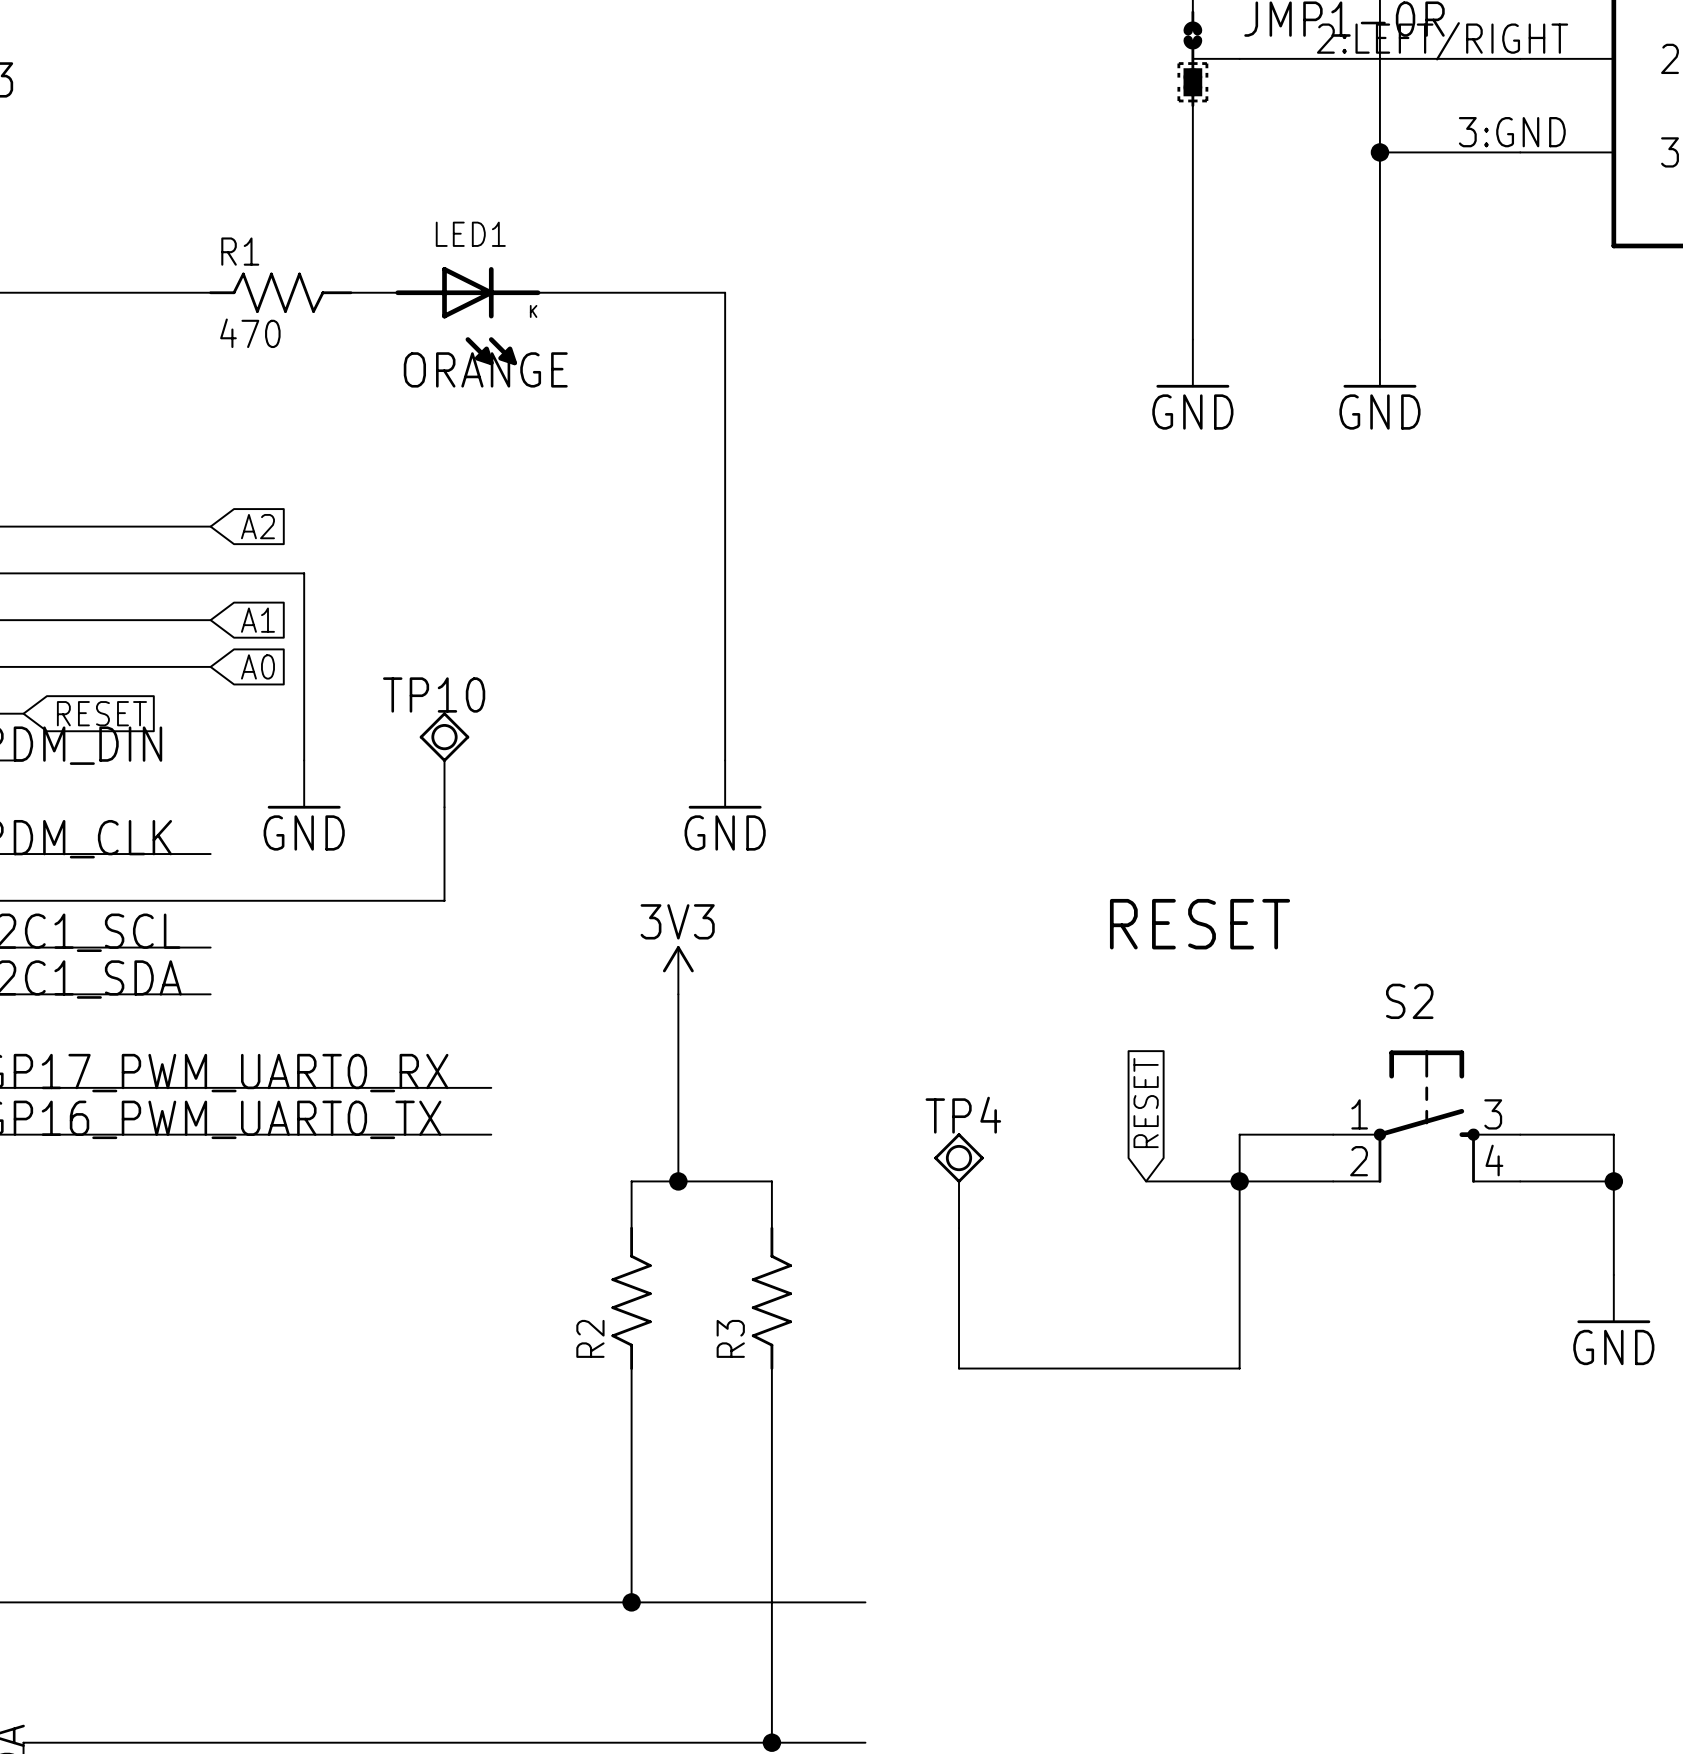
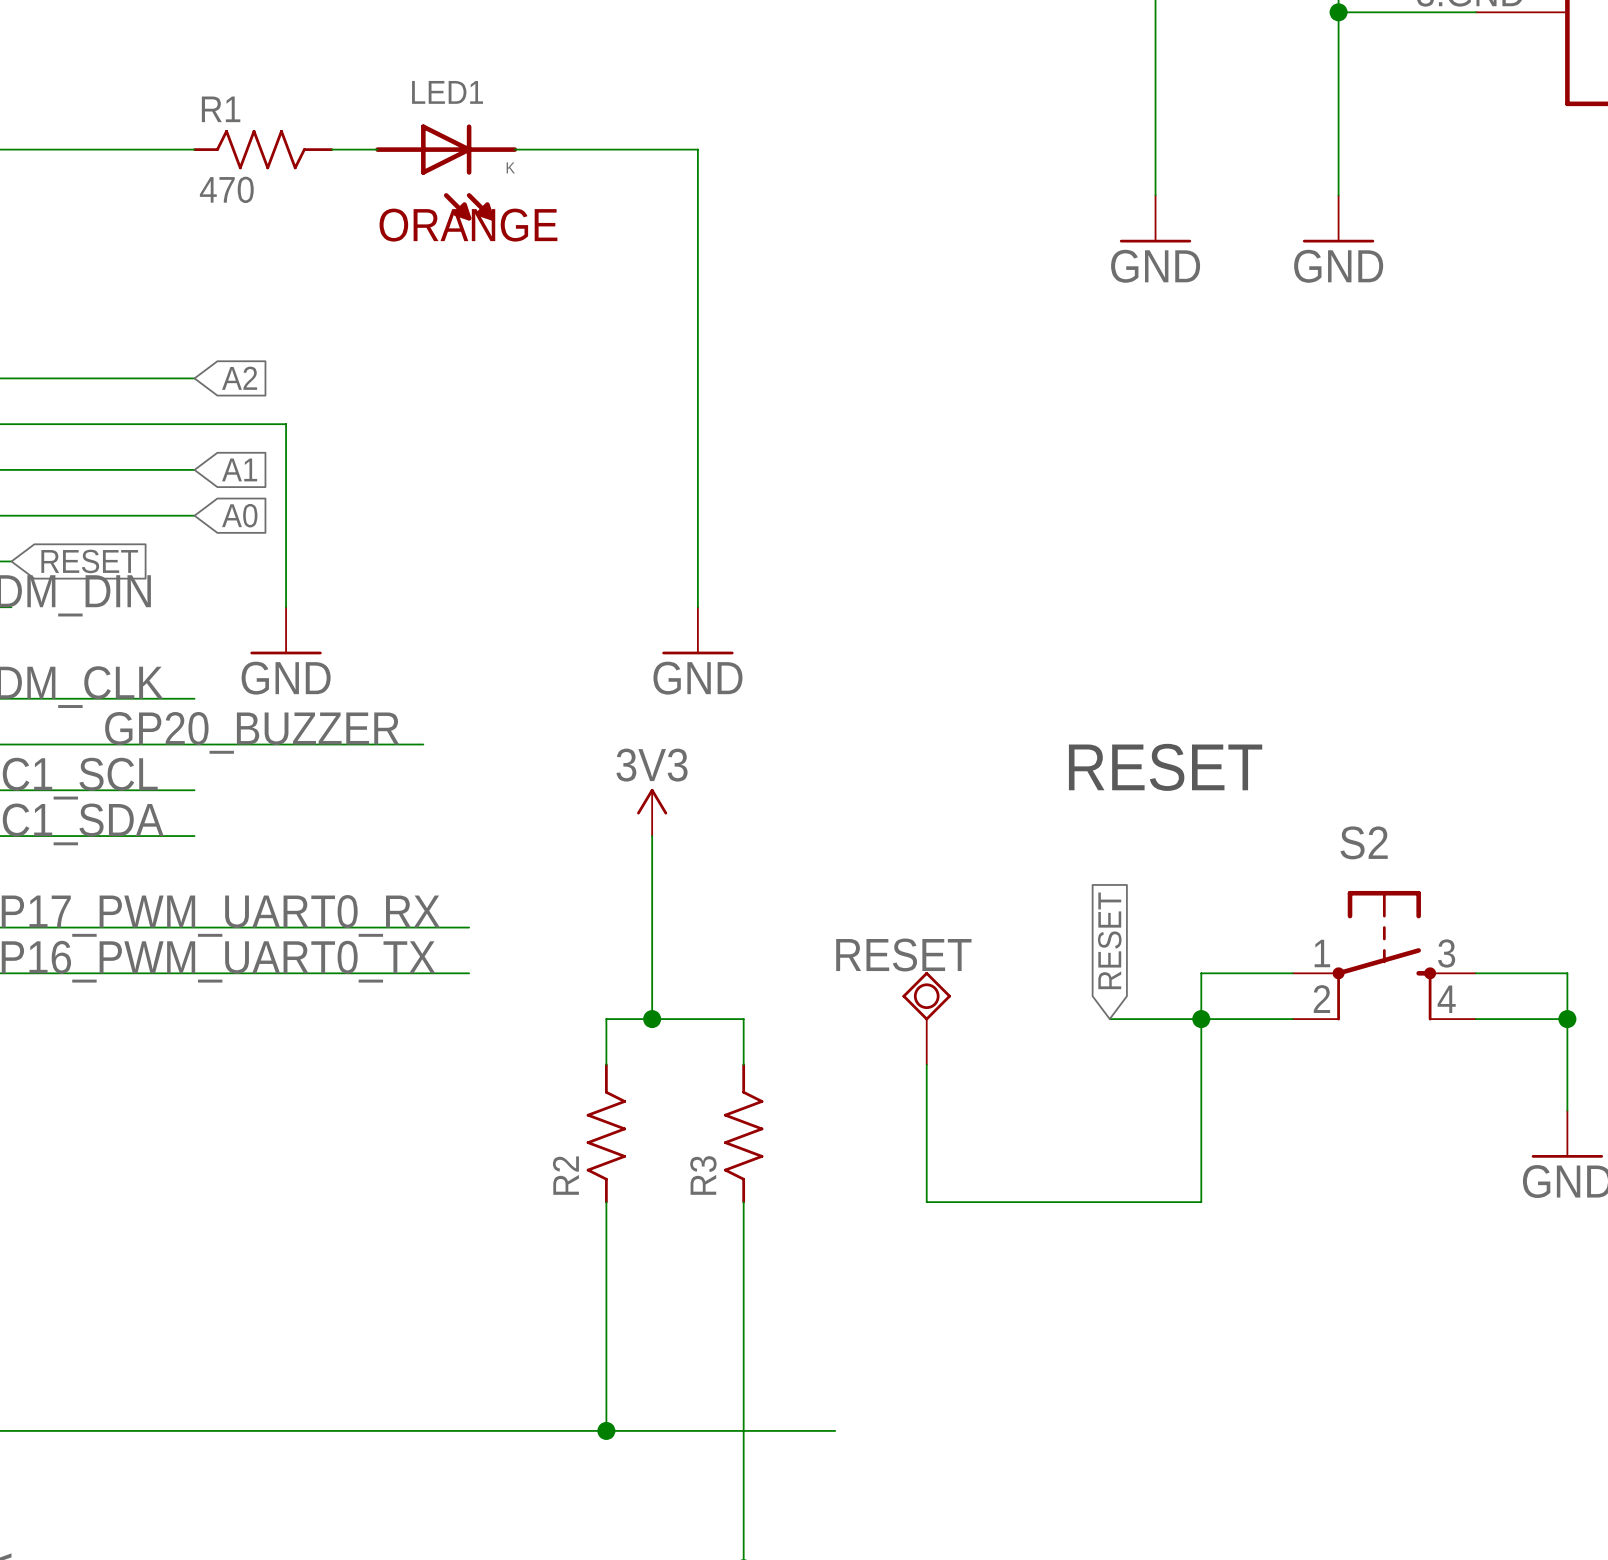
TP10: (444, 759) -> none
wire: (444, 807) (444, 900) -> none
label: none -> GP20_BUZZER (252, 732)
TP4 name: TP4 (963, 1115) -> RESET (903, 955)

